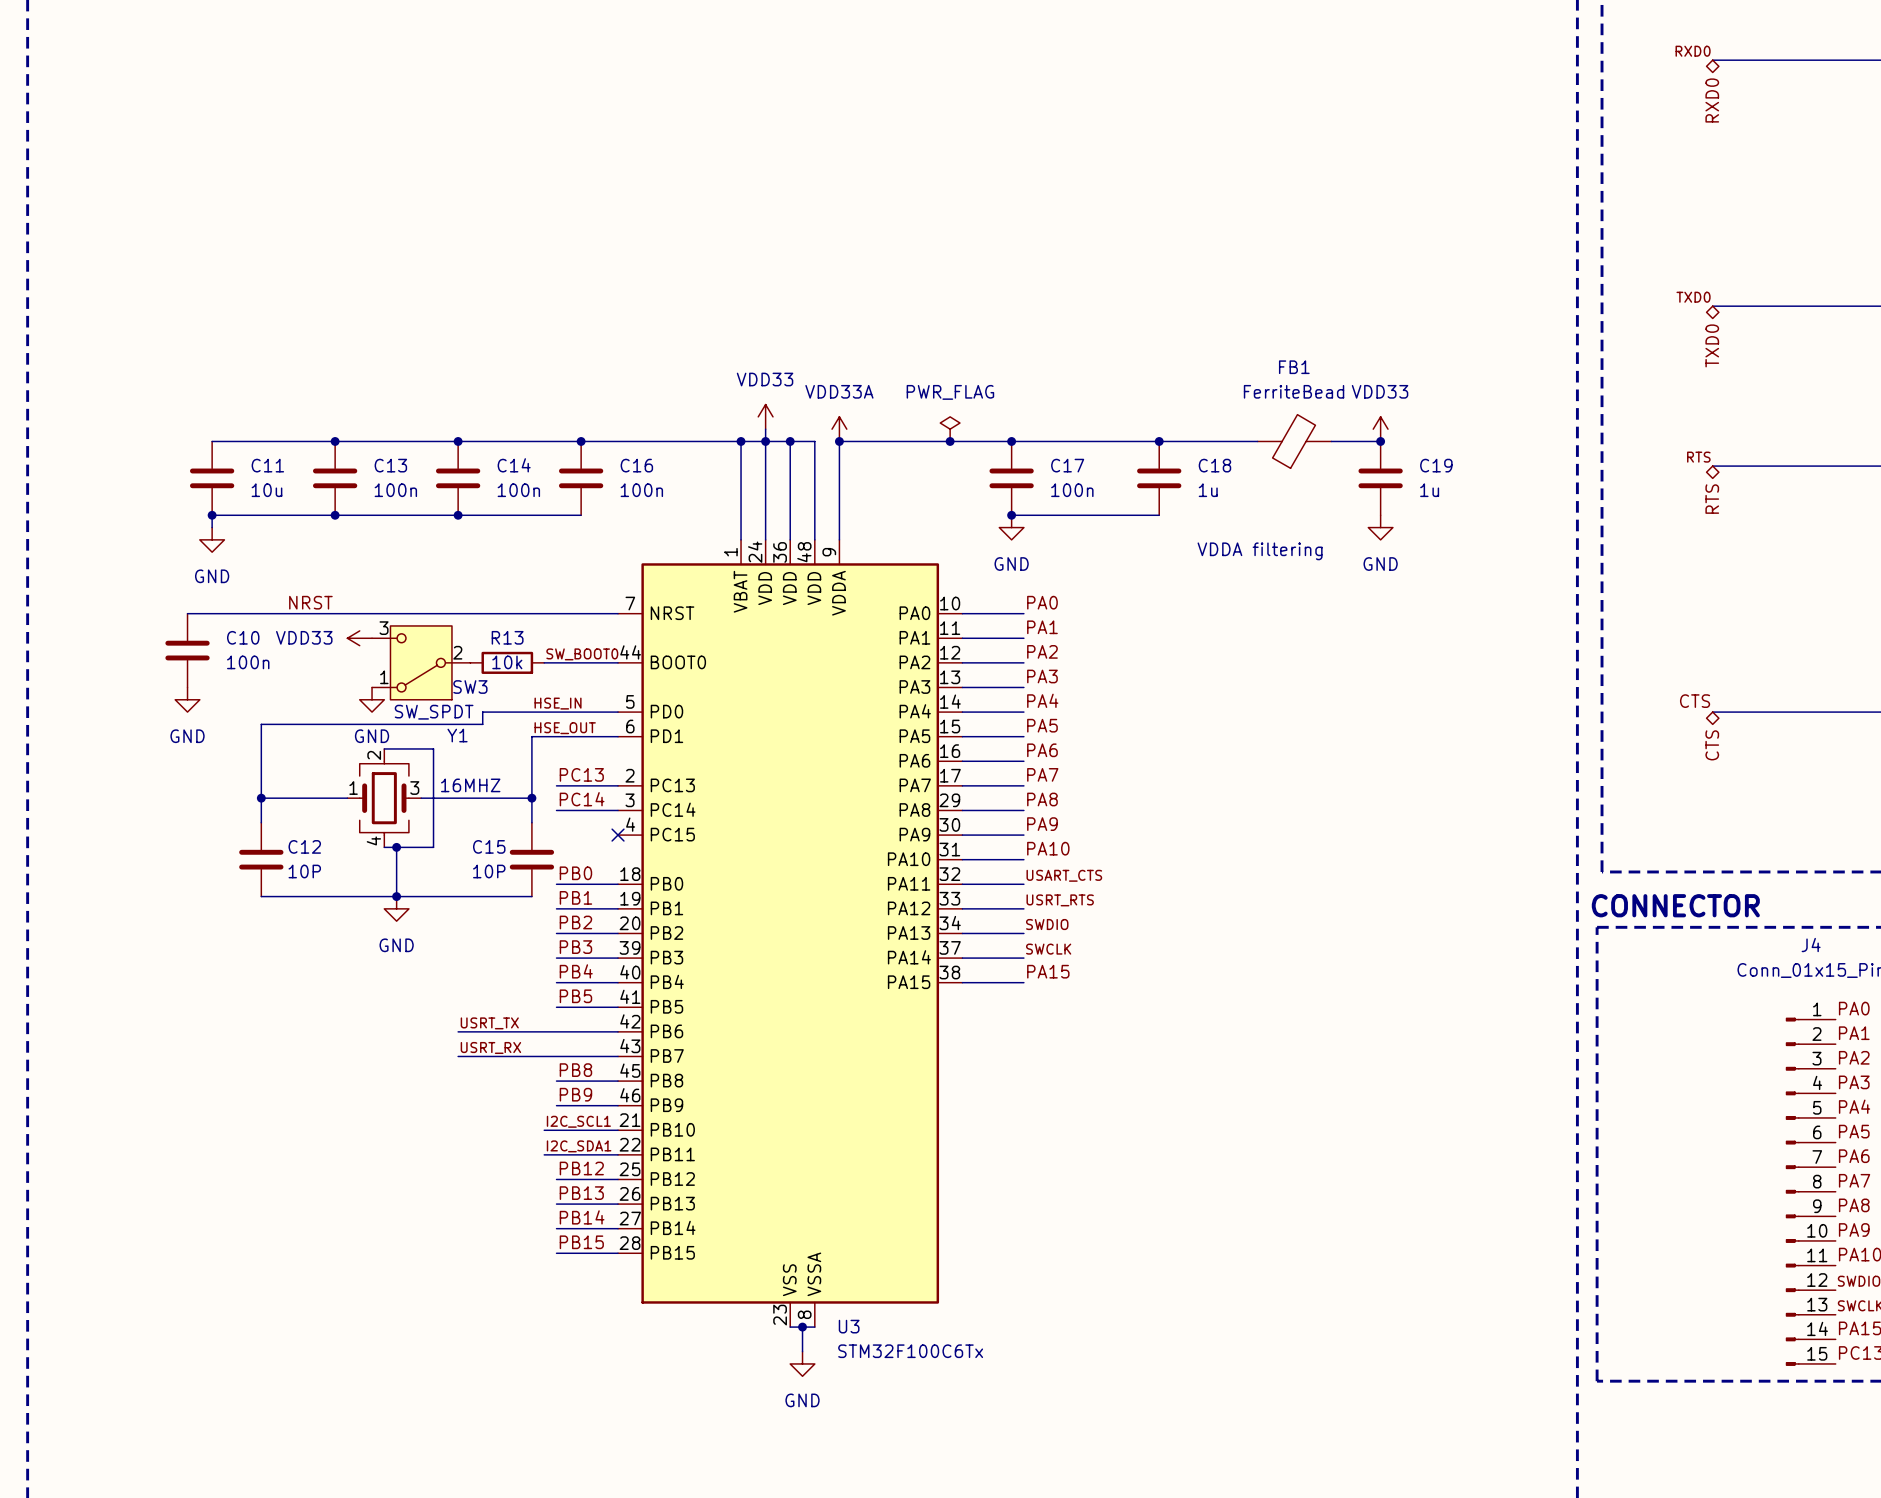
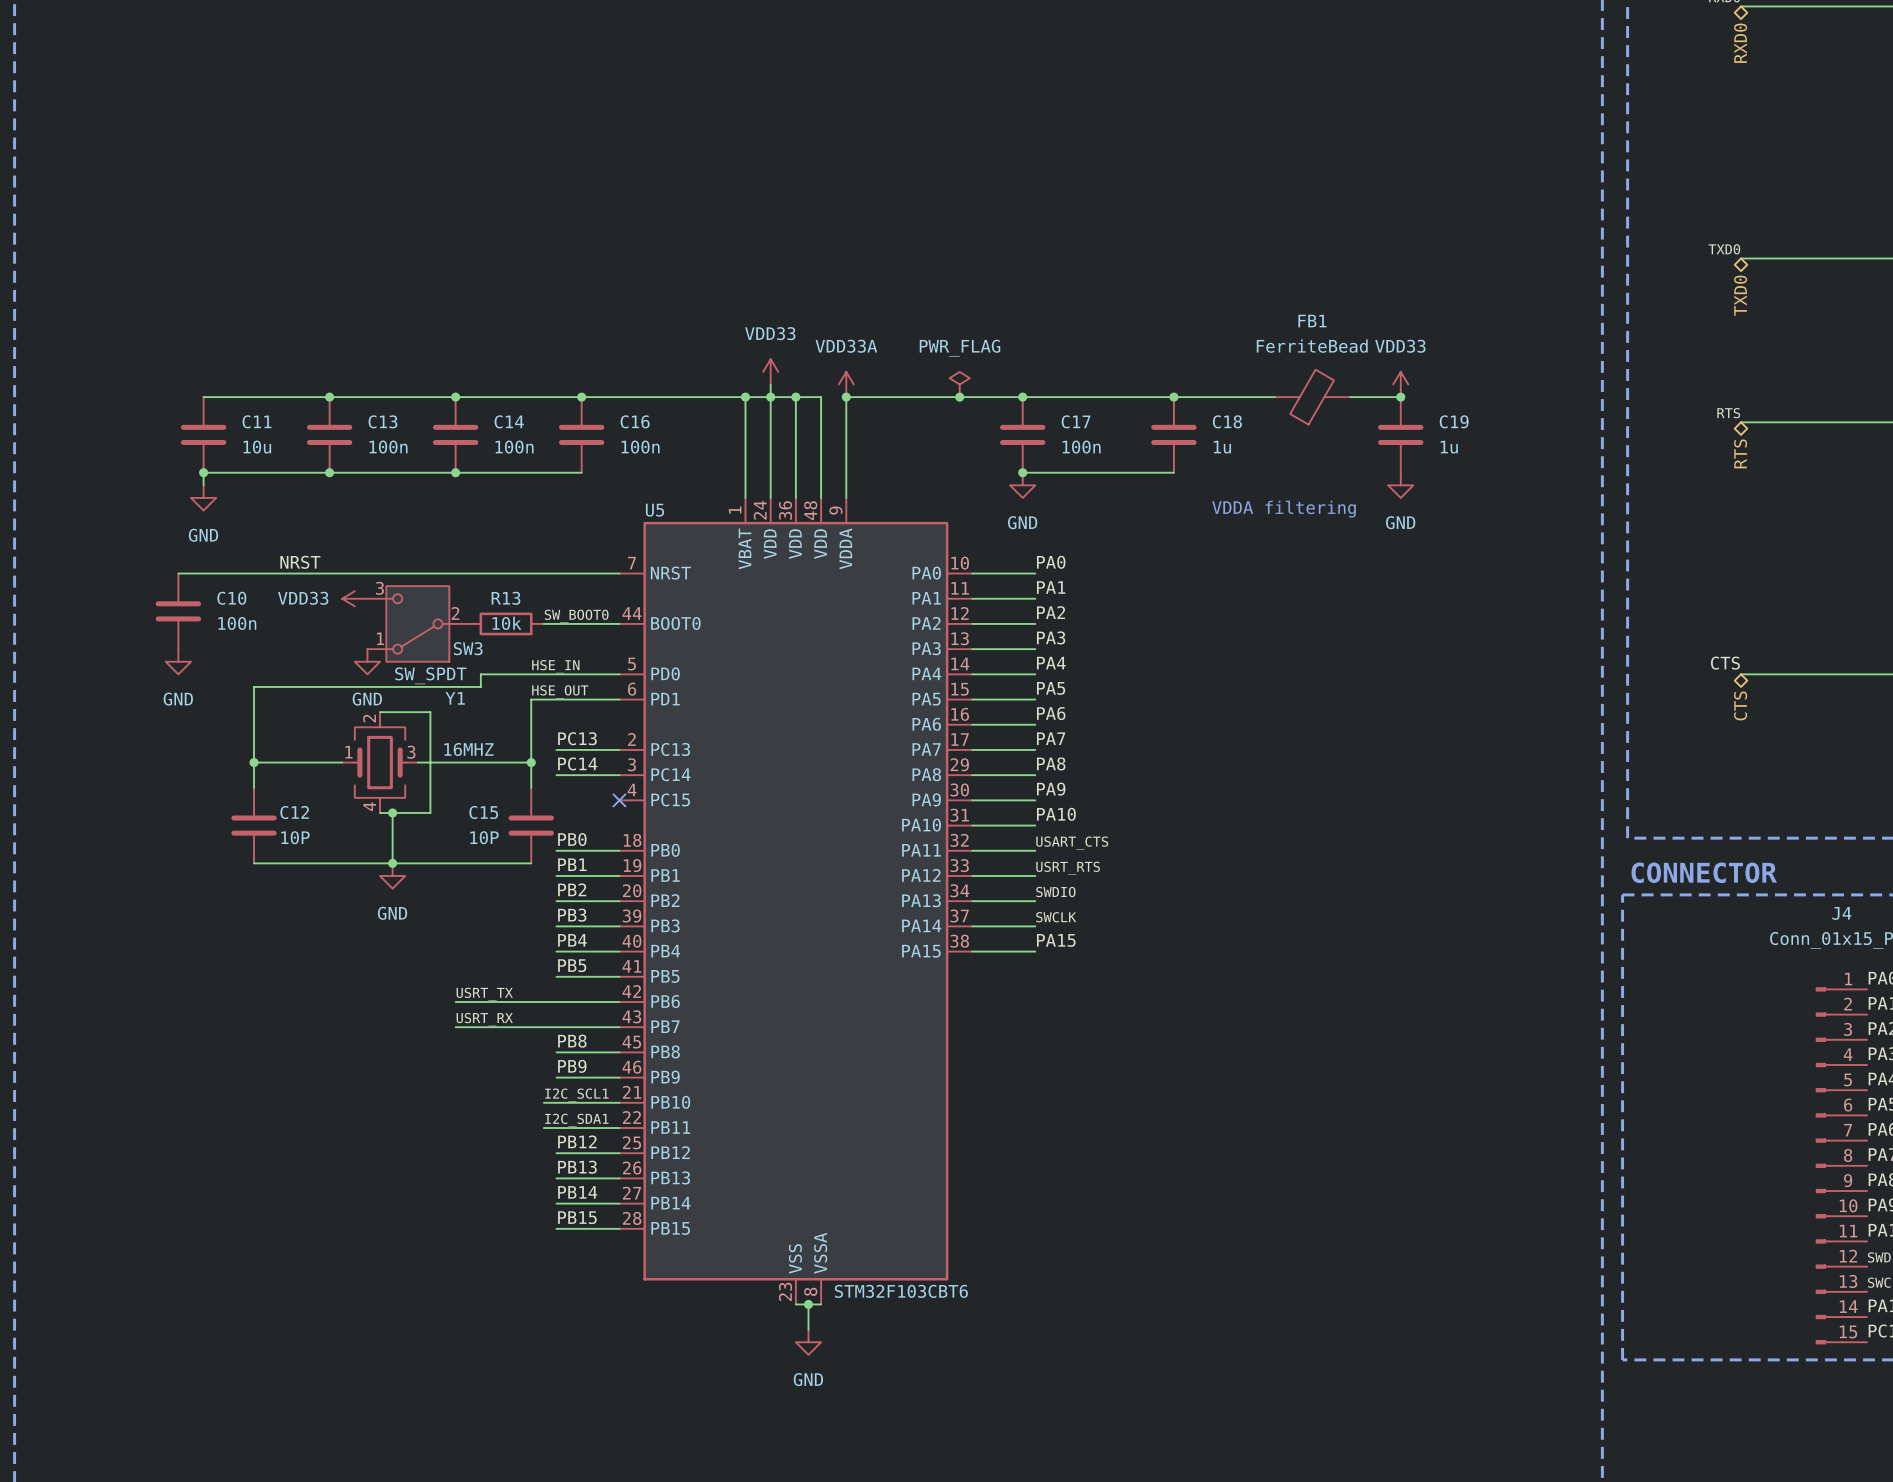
U3 name: U3 (849, 1326) -> U5 (655, 510)
U3 value: STM32F100C6Tx (910, 1351) -> STM32F103CBT6 (901, 1291)

